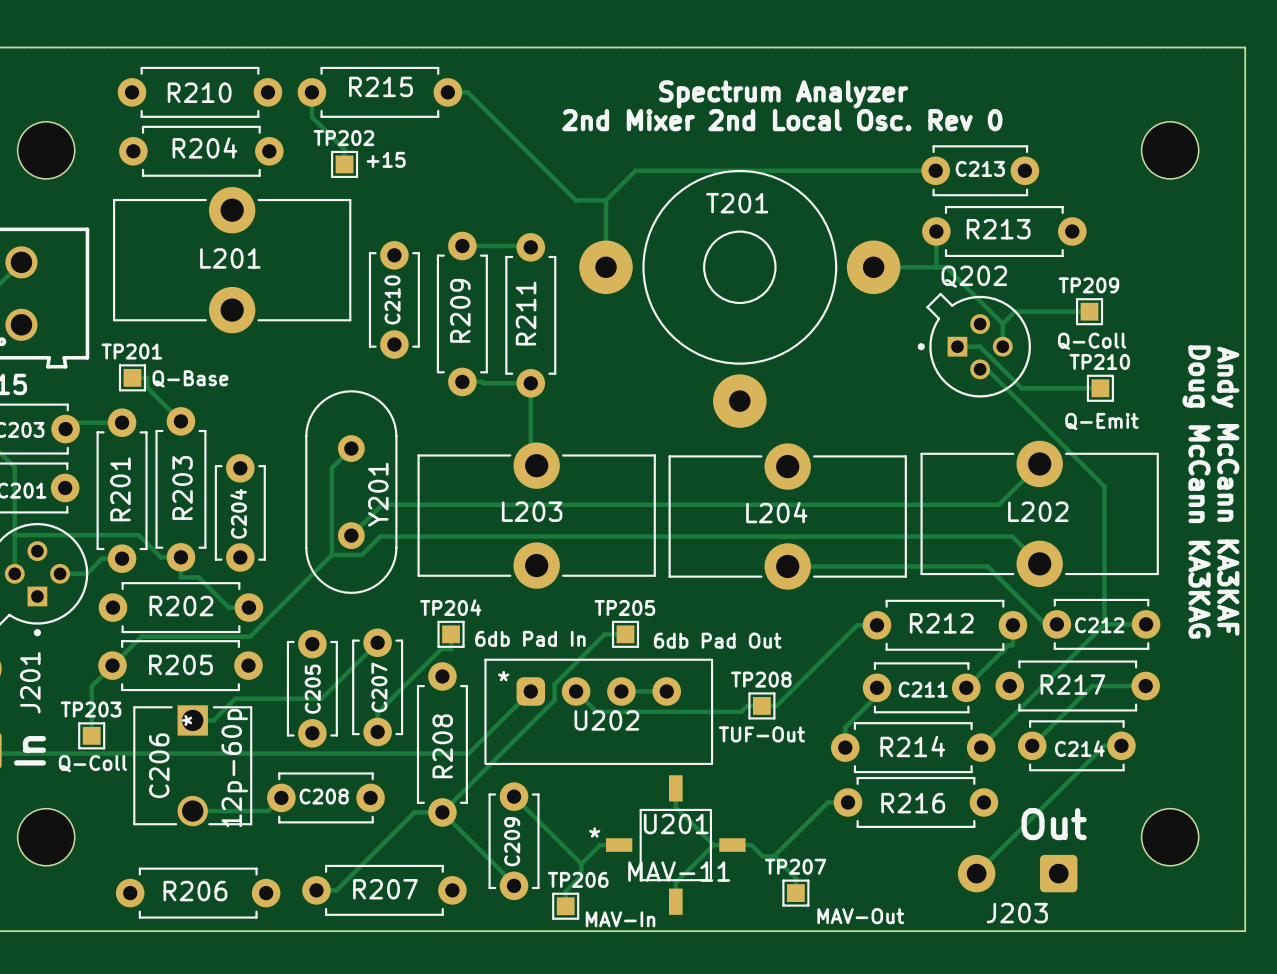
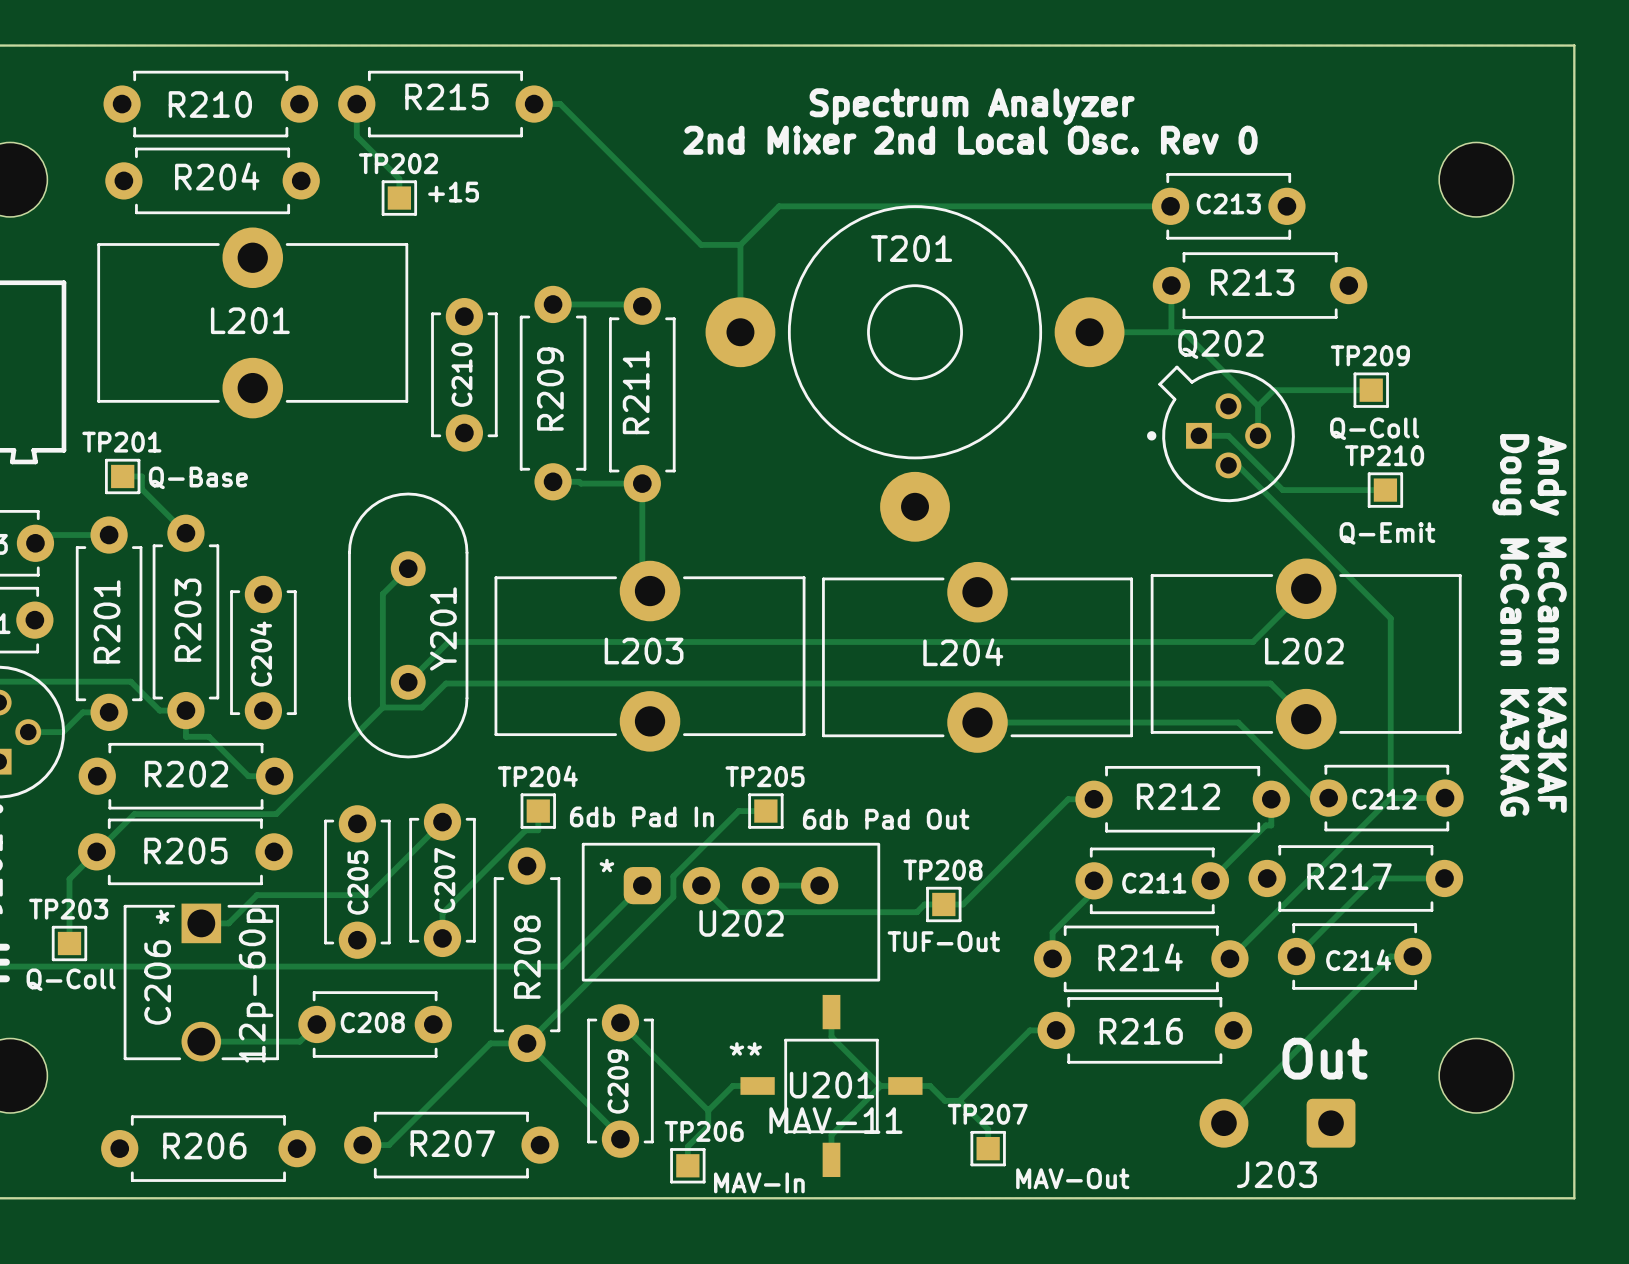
C206 text position: * (186, 720) -> * (162, 916)
U201 text: none -> * (754, 1048)
U201 name position: U201 (676, 824) -> U201 (832, 1085)
U201 text position: * (594, 832) -> * (736, 1048)

